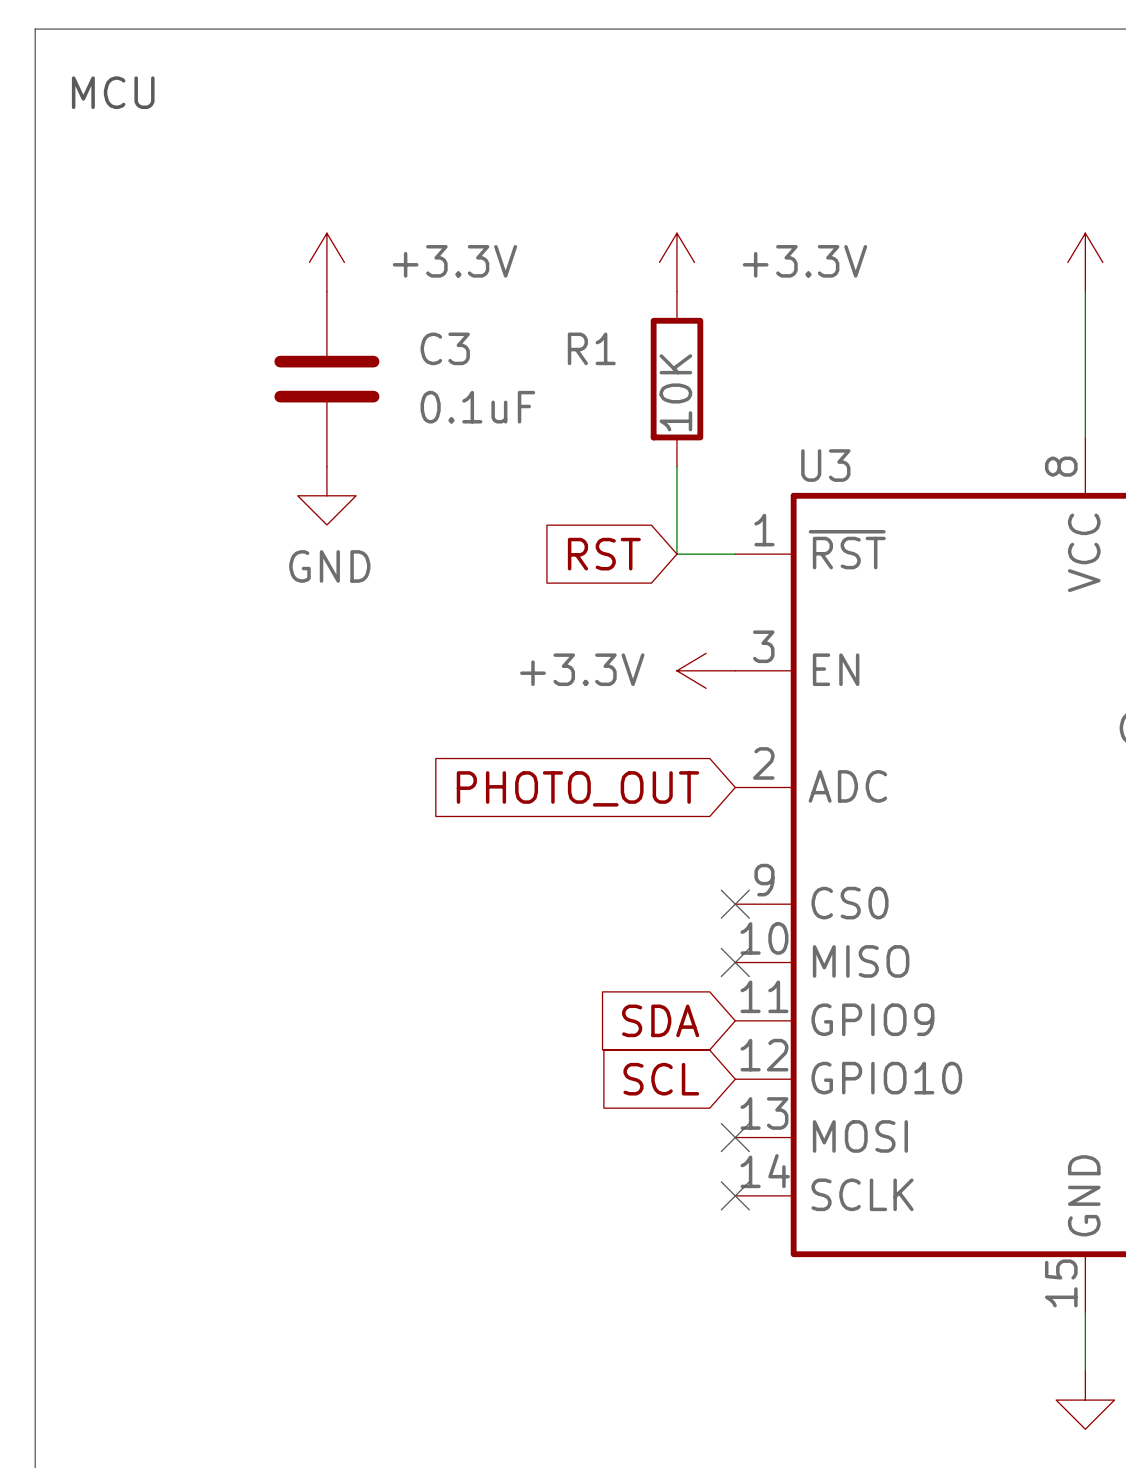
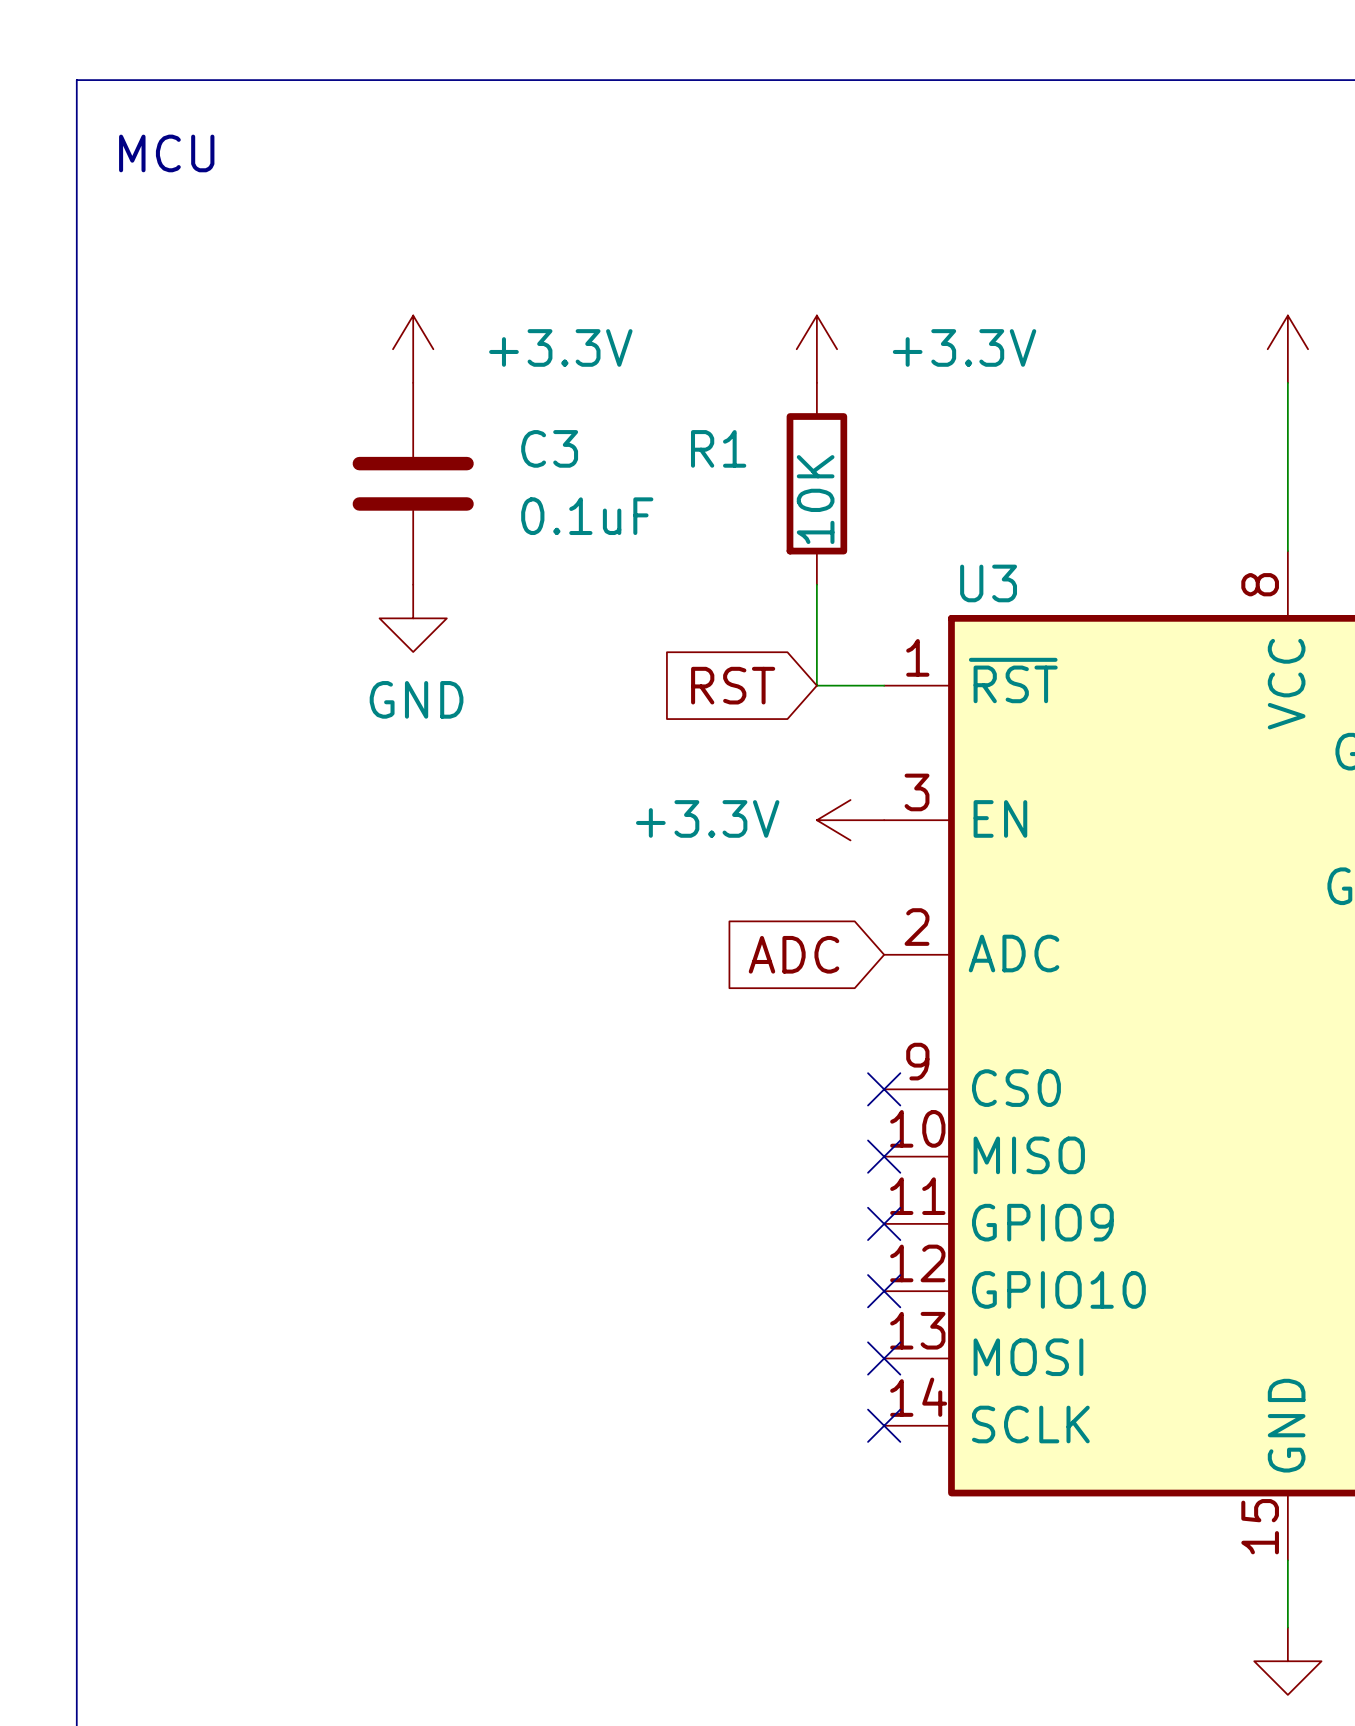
global label: PHOTO_OUT (577, 788) -> ADC (794, 954)
global label: SDA (660, 1020) -> none
no-connect mark: none -> (884, 1223)
global label: SCL (661, 1079) -> none
no-connect mark: none -> (884, 1291)

